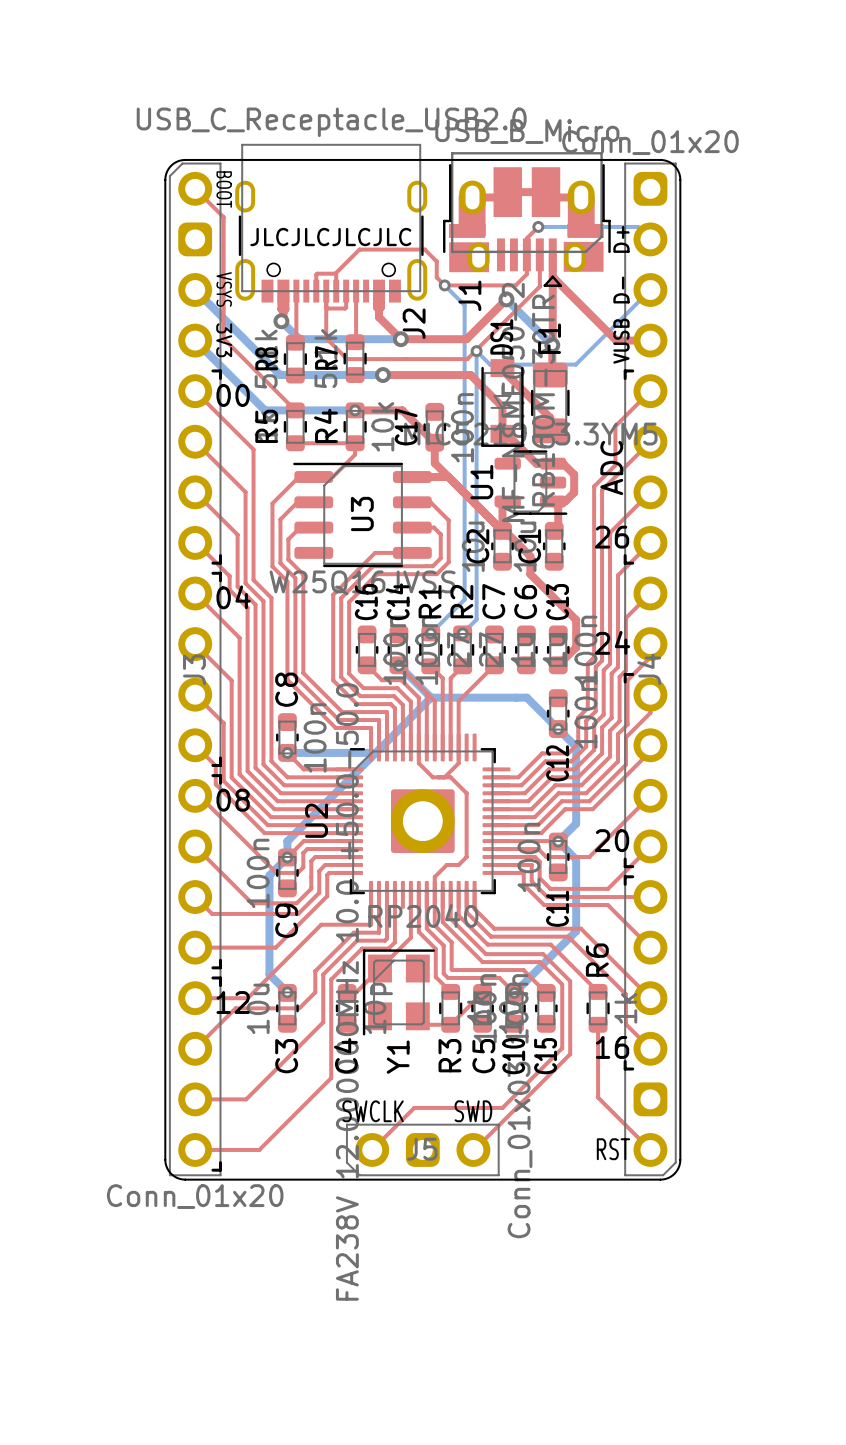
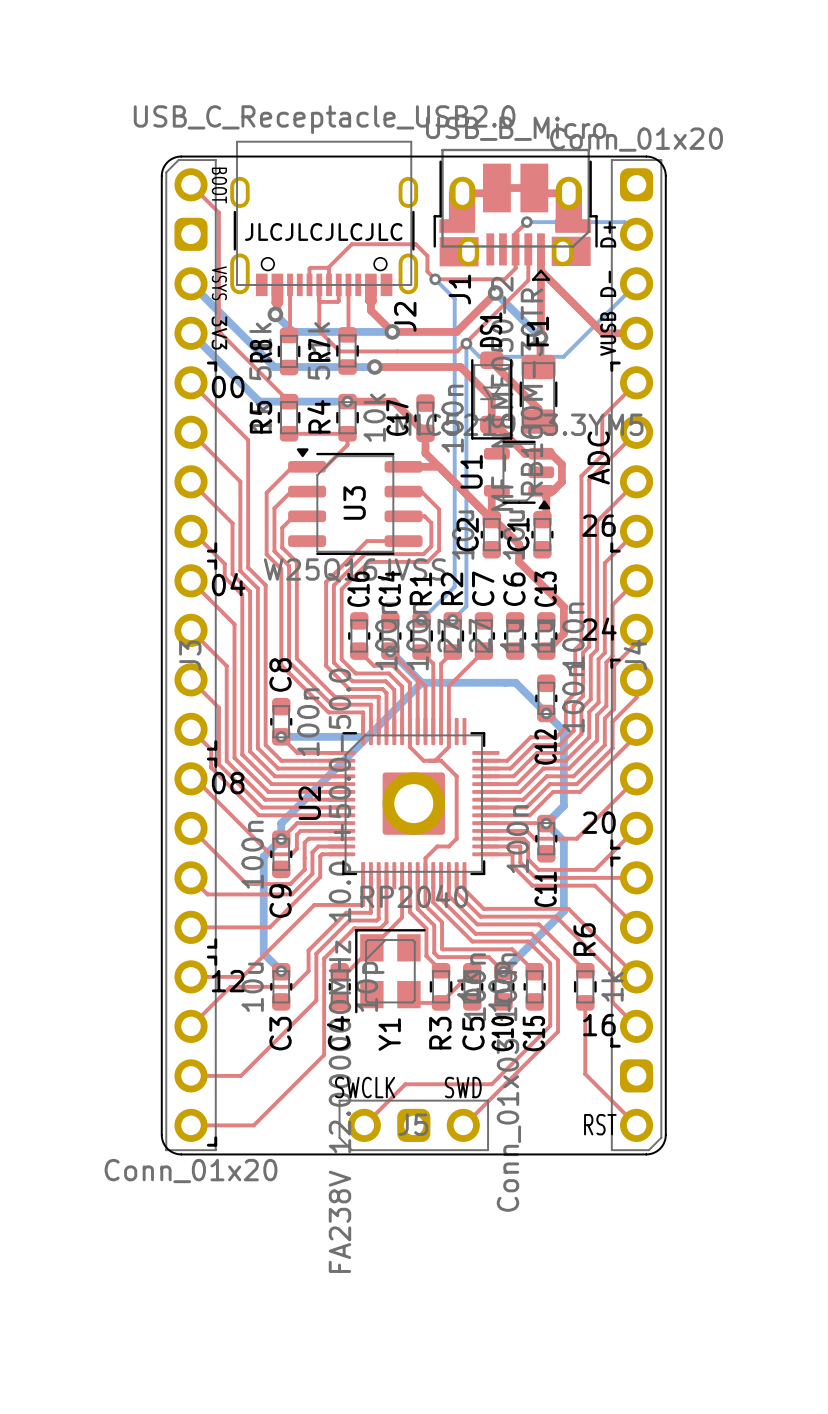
DS1 footprint: [481, 359, 524, 447] -> [471, 351, 513, 440]
U1 footprint: [494, 450, 568, 515] -> [483, 440, 555, 510]
U3 footprint: [293, 462, 432, 568] -> [288, 448, 423, 556]

